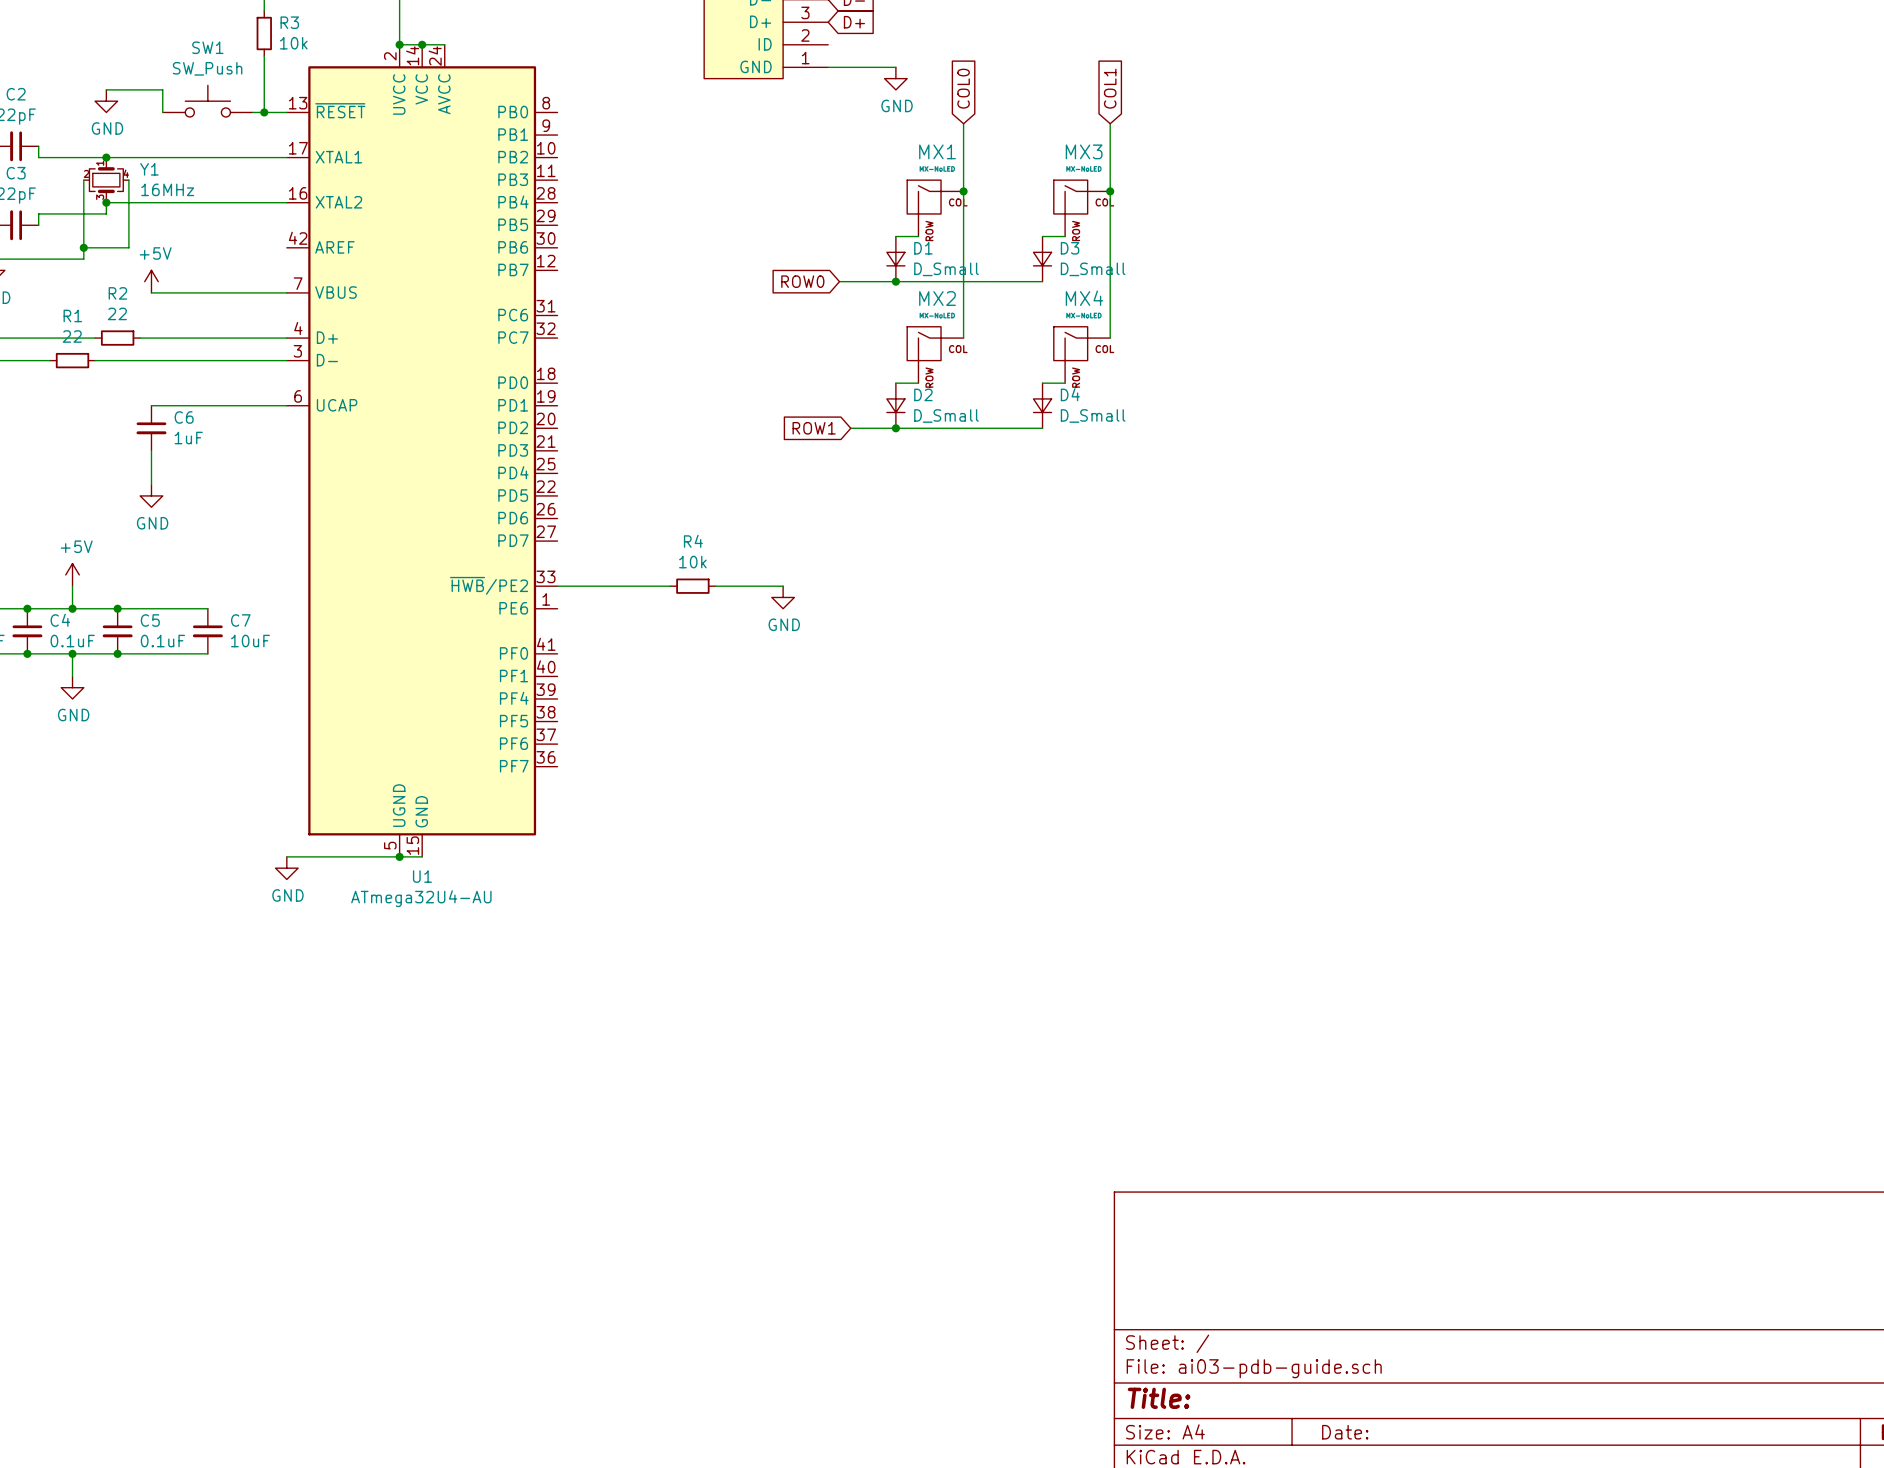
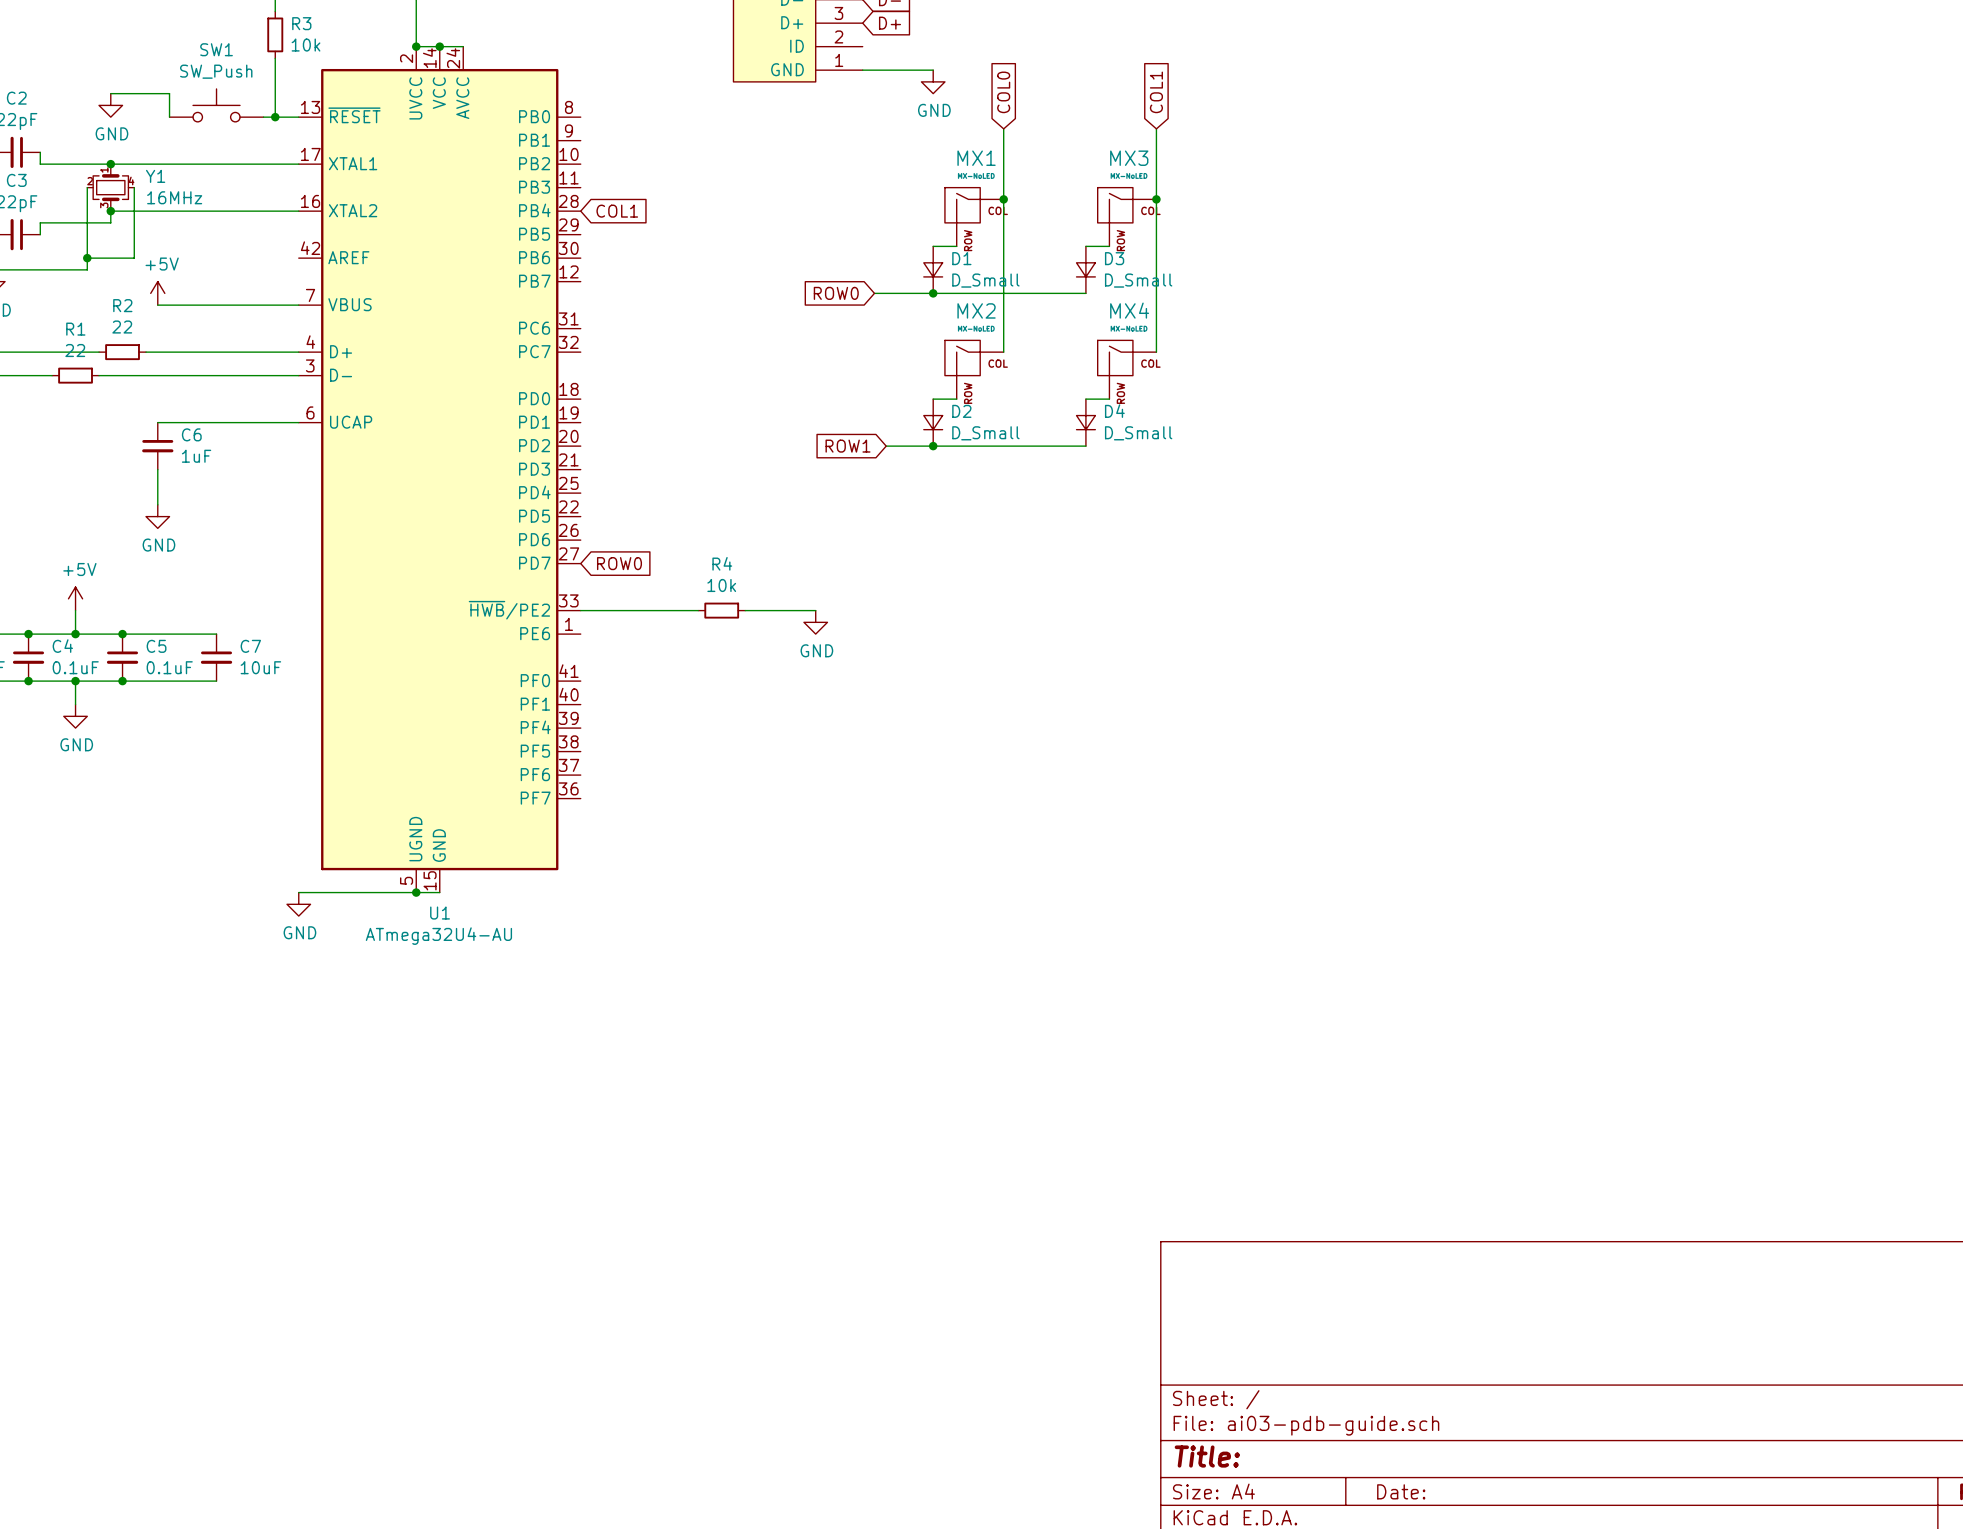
global label: none -> COL1 (617, 211)
global label: none -> ROW0 (619, 563)

